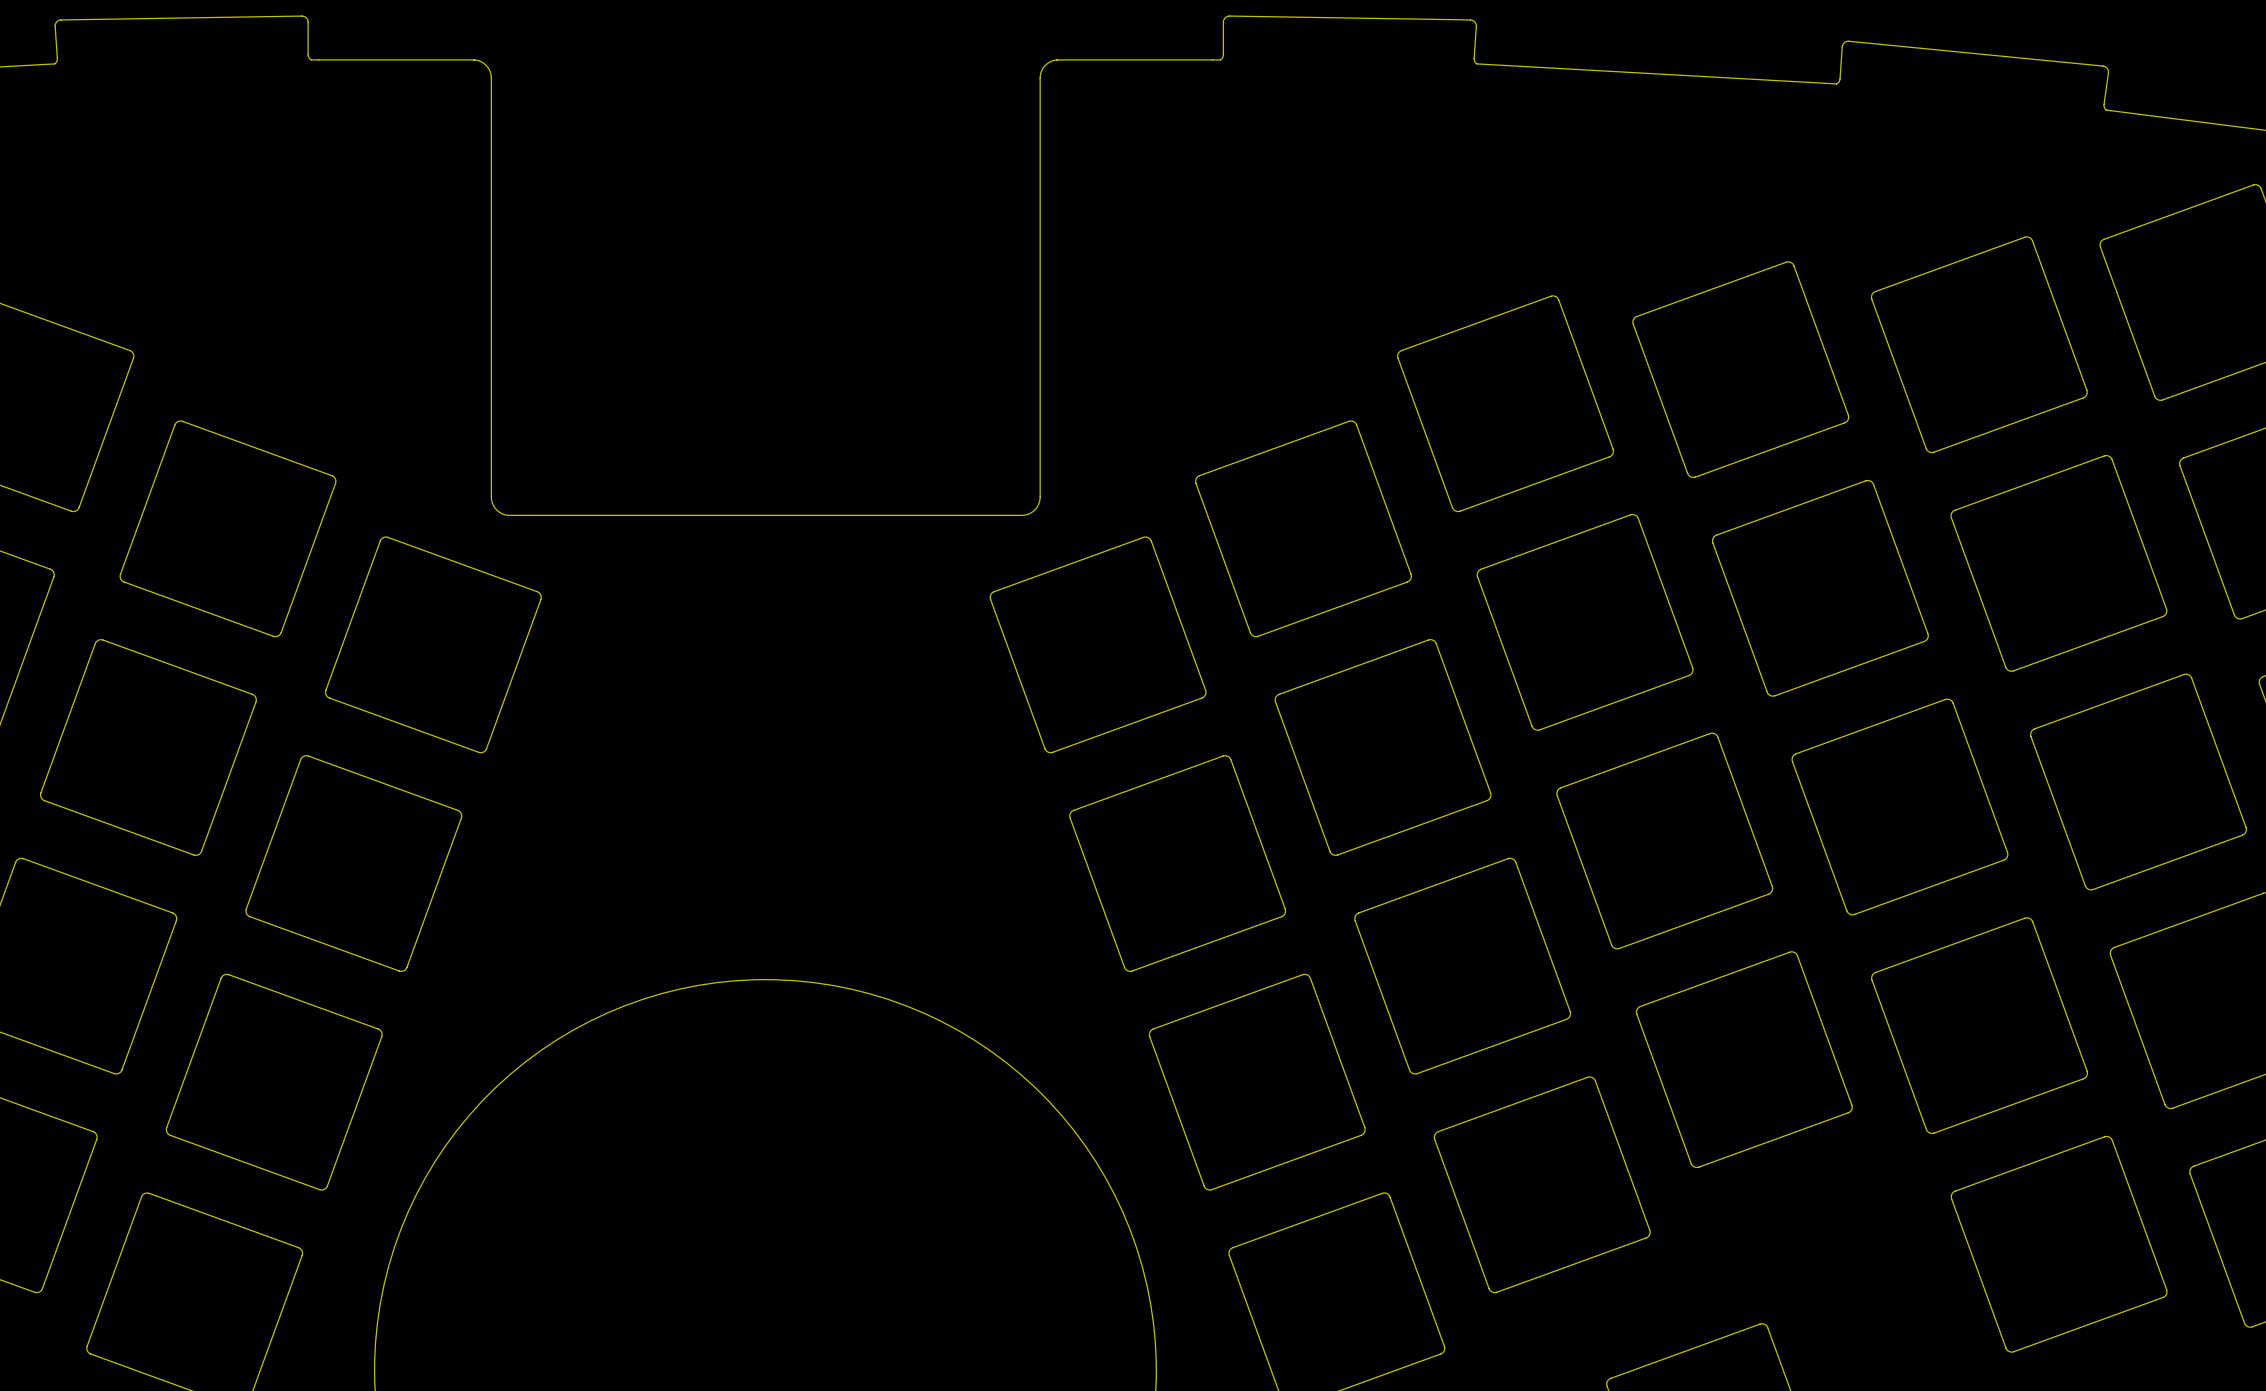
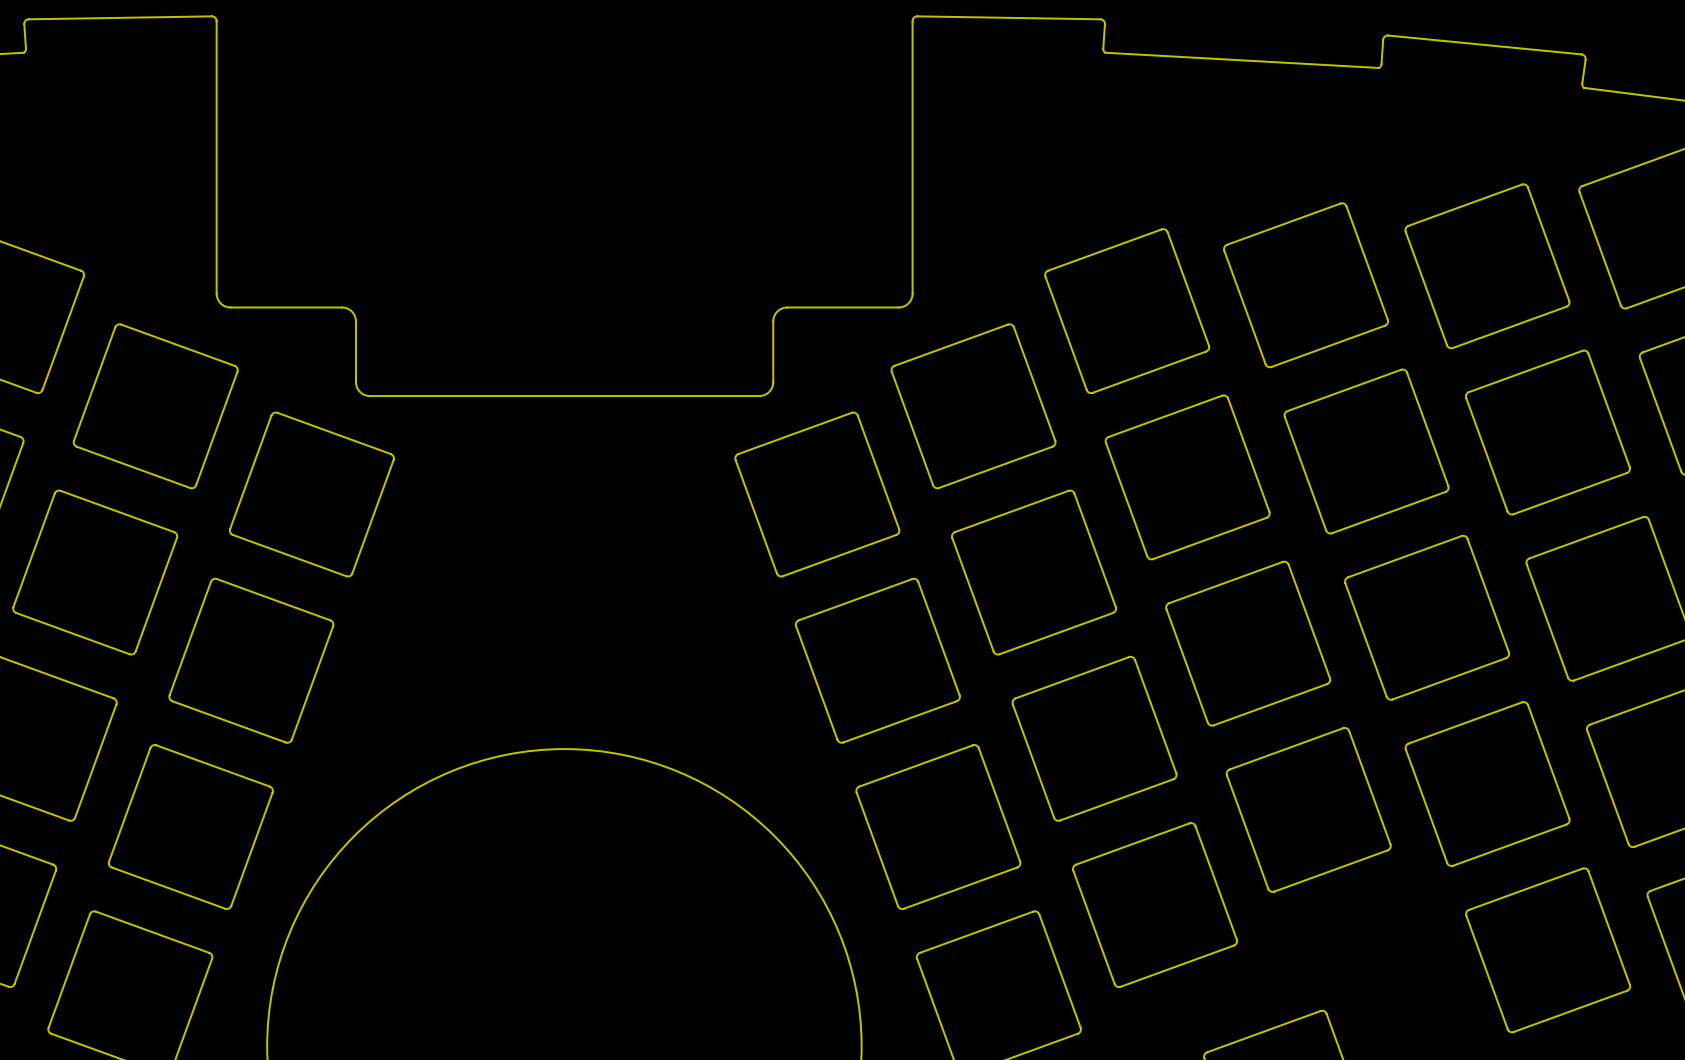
board edge: (308, 54) (311, 59) (474, 59) (483, 62) (489, 69) (491, 78) (491, 417) -> (216, 45) (216, 293) (218, 300) (223, 305) (230, 307) (343, 307) (351, 311) (355, 321)
board edge: (1223, 54) (1220, 59) (1056, 59) (1048, 62) (1042, 69) (1040, 78) (1040, 417) -> (912, 45) (911, 299) (906, 305) (900, 307) (785, 307) (777, 311) (773, 321)

